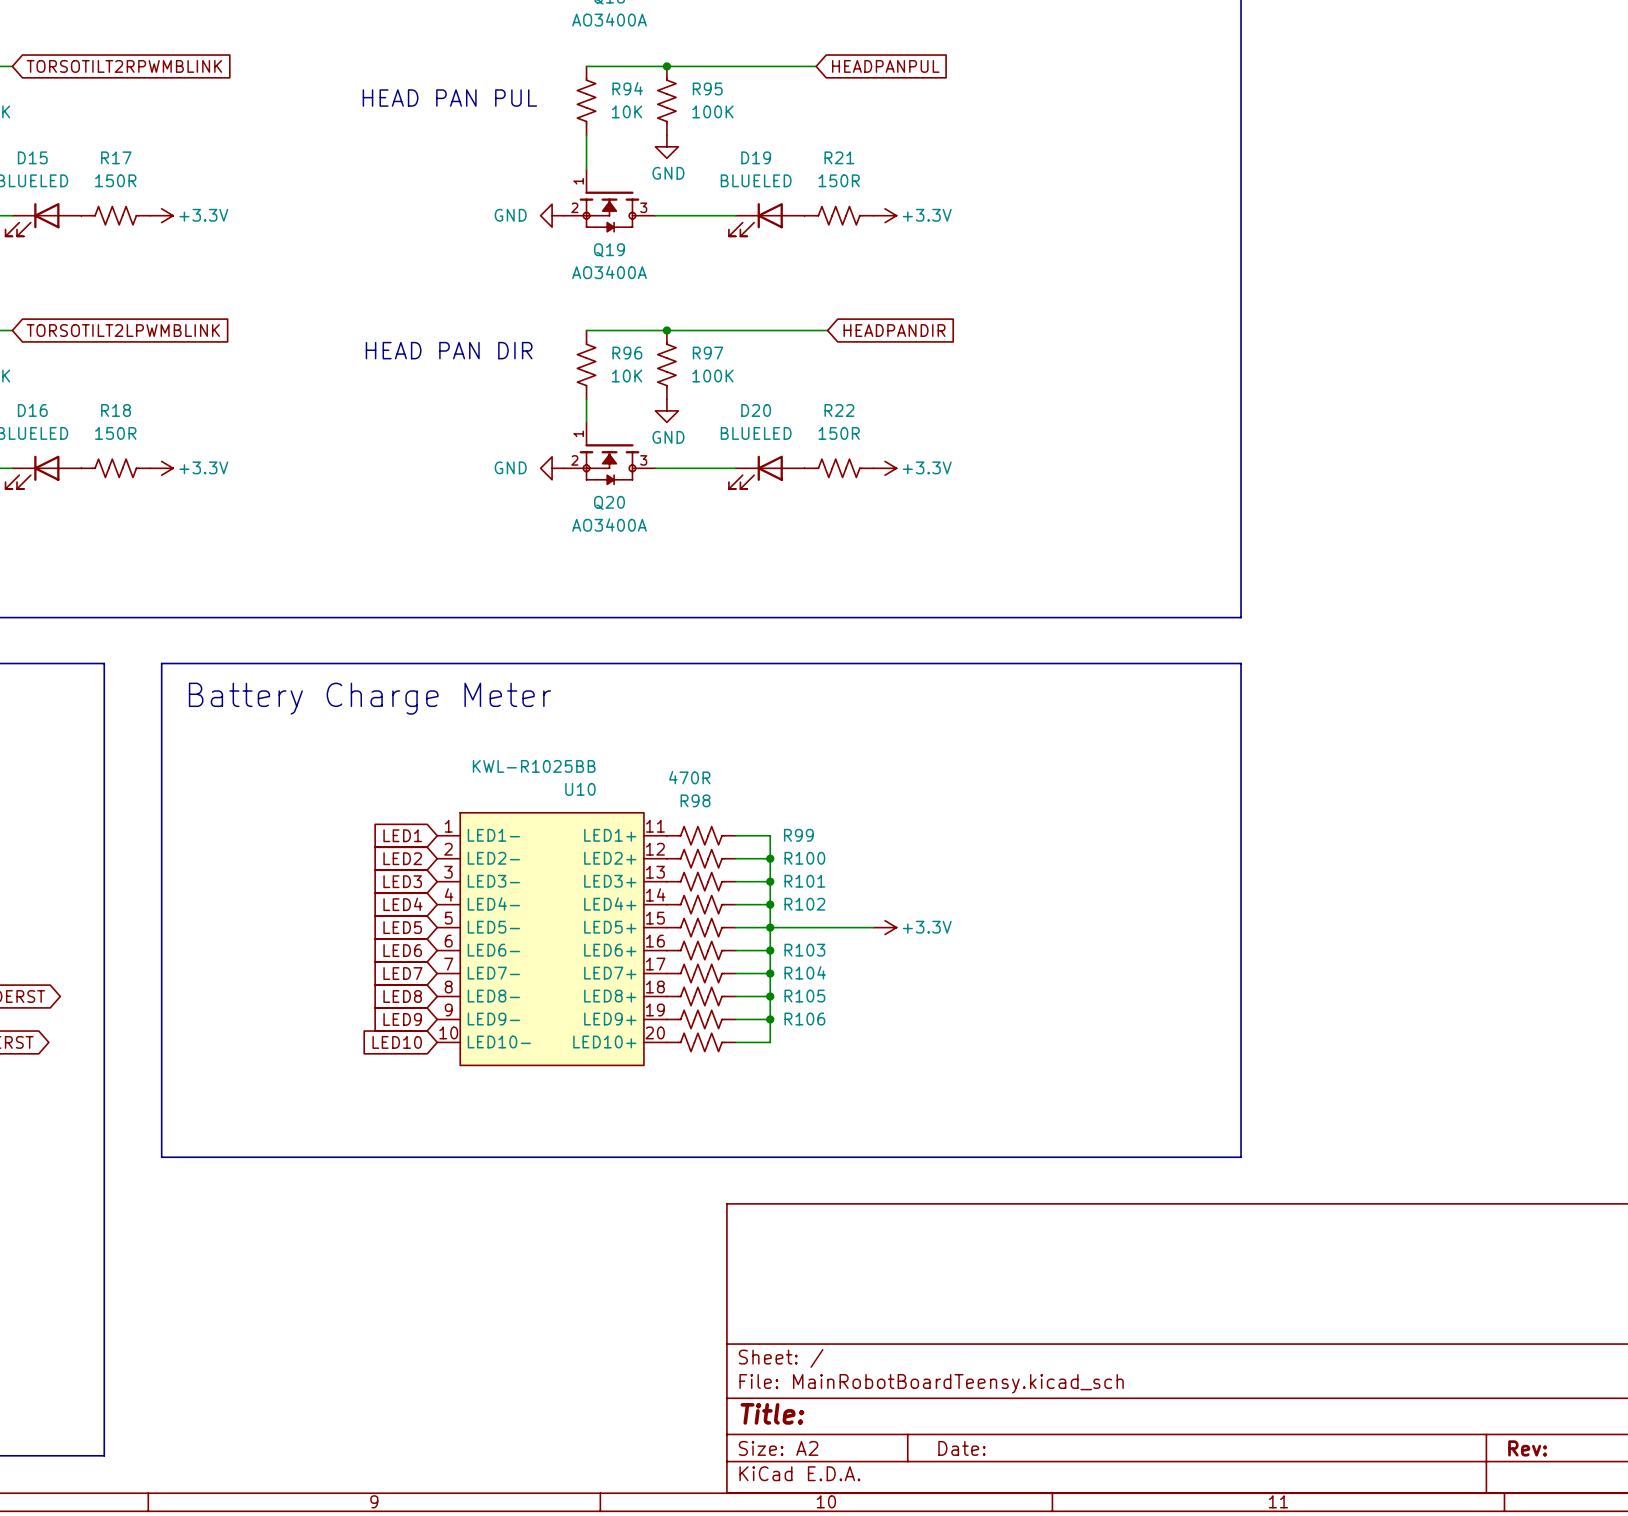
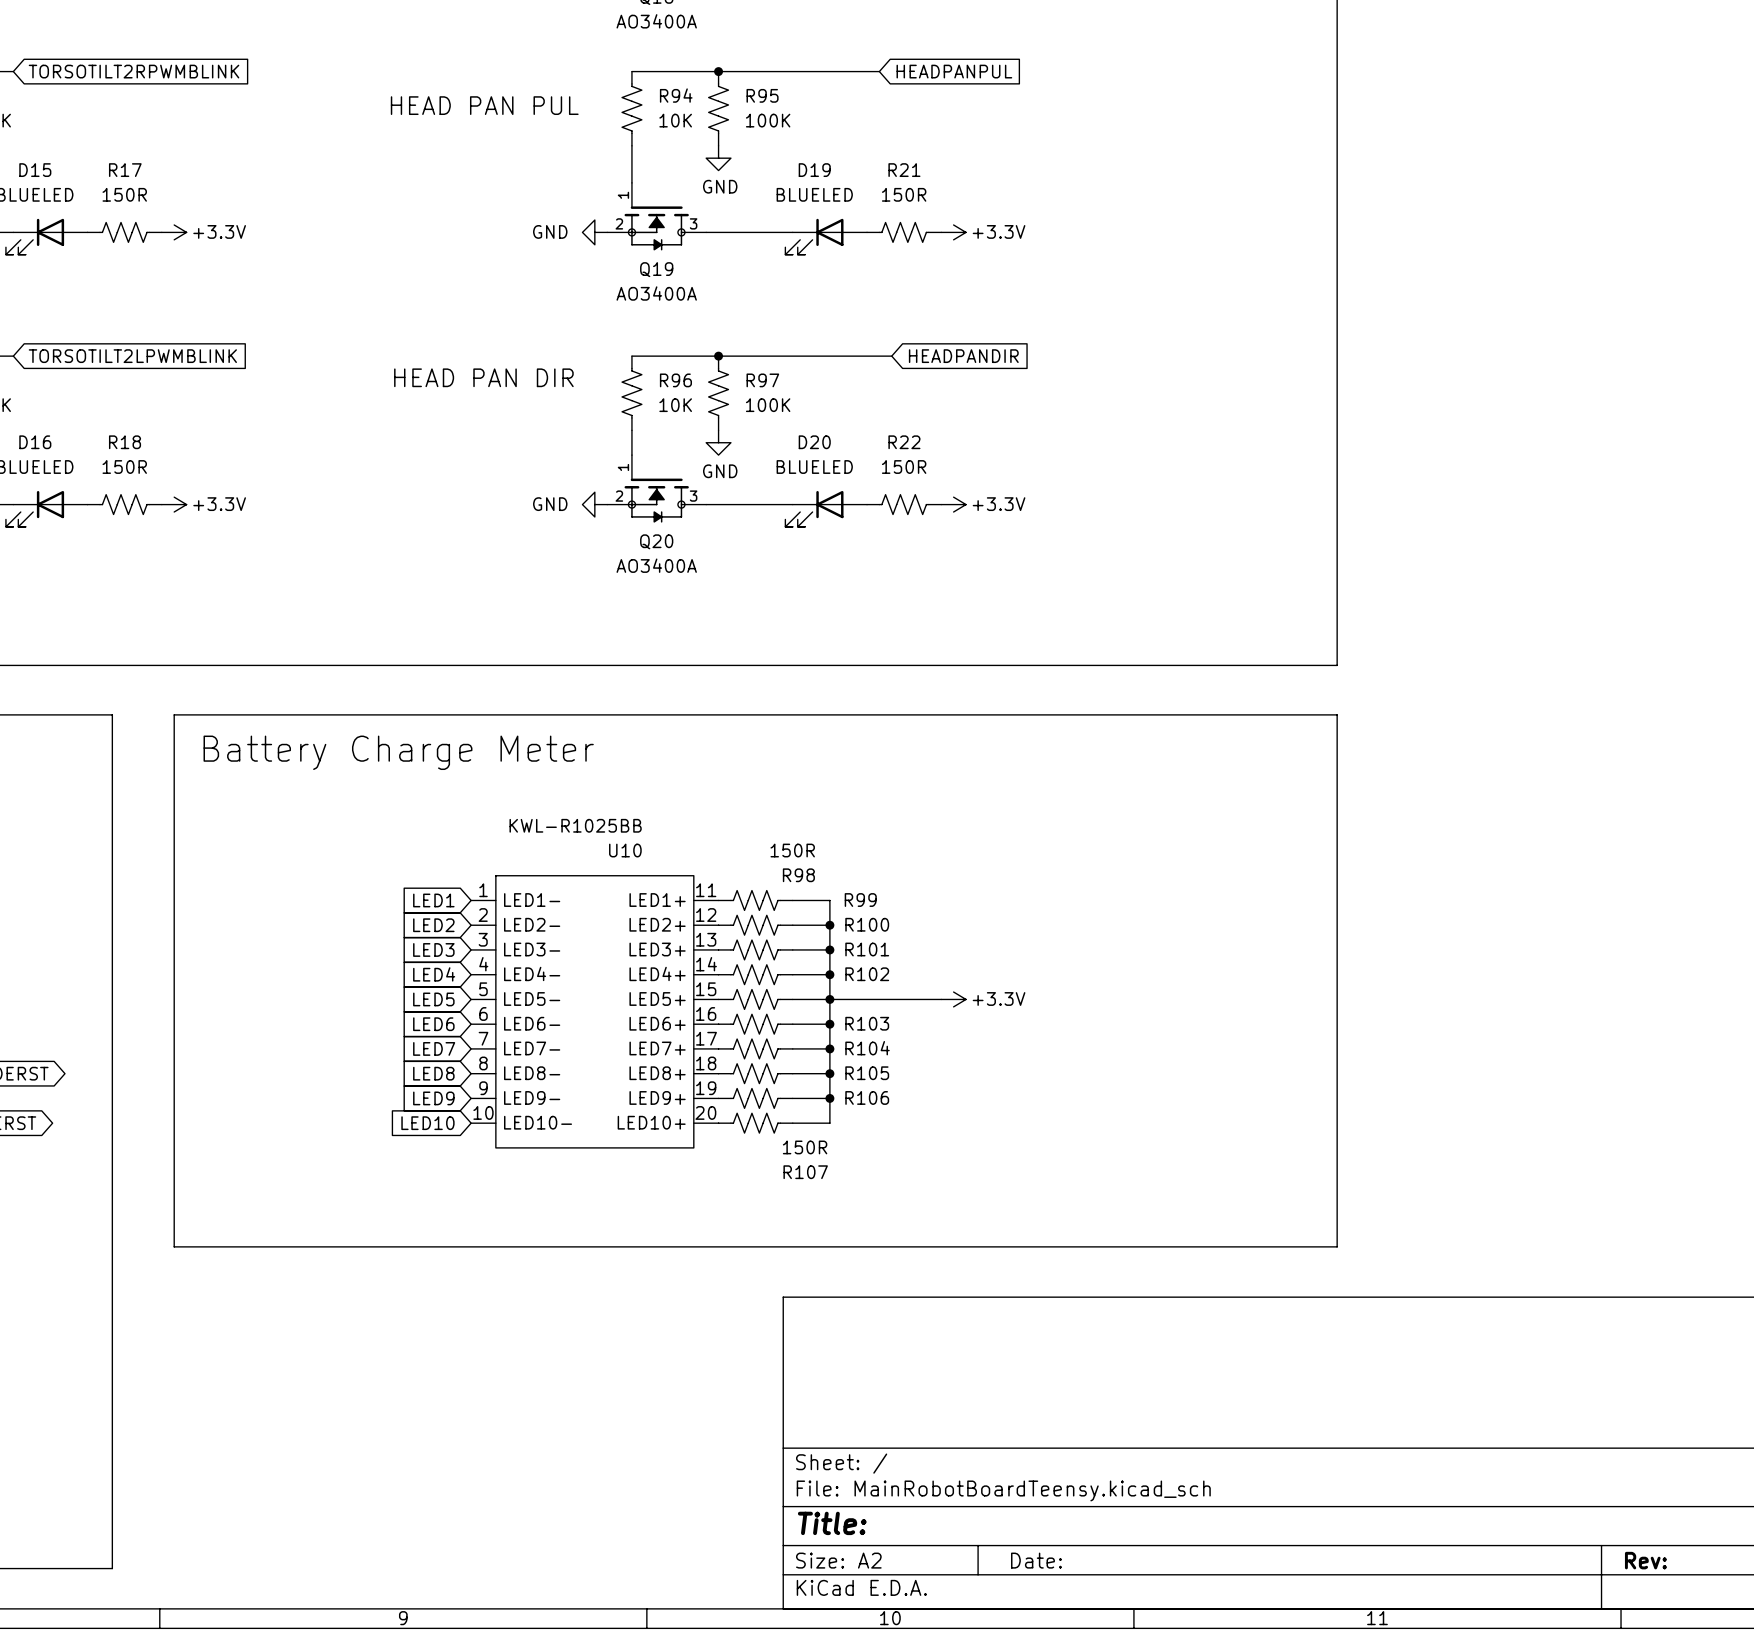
R98 value: 470R (689, 777) -> 150R (792, 850)
R98 name position: R98 (695, 800) -> R98 (798, 875)
R107 value: none -> 150R (805, 1147)
R107 name: none -> R107 (805, 1172)

